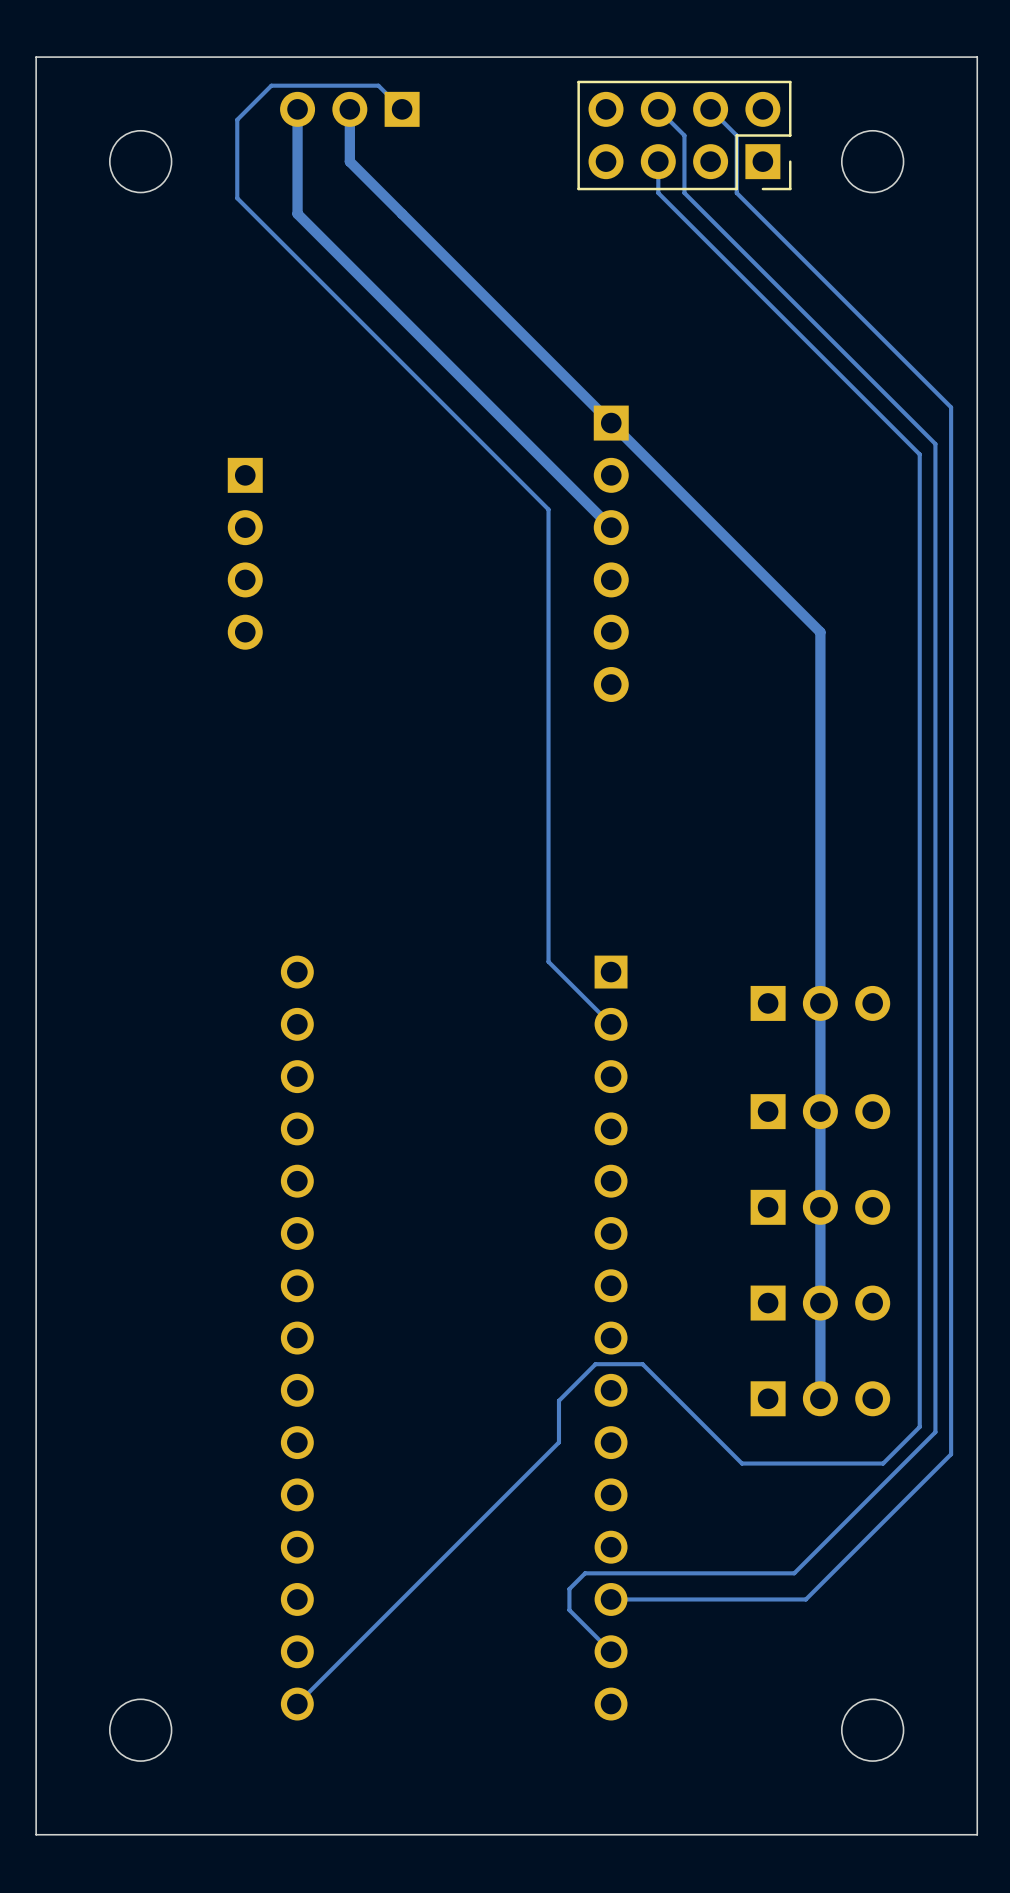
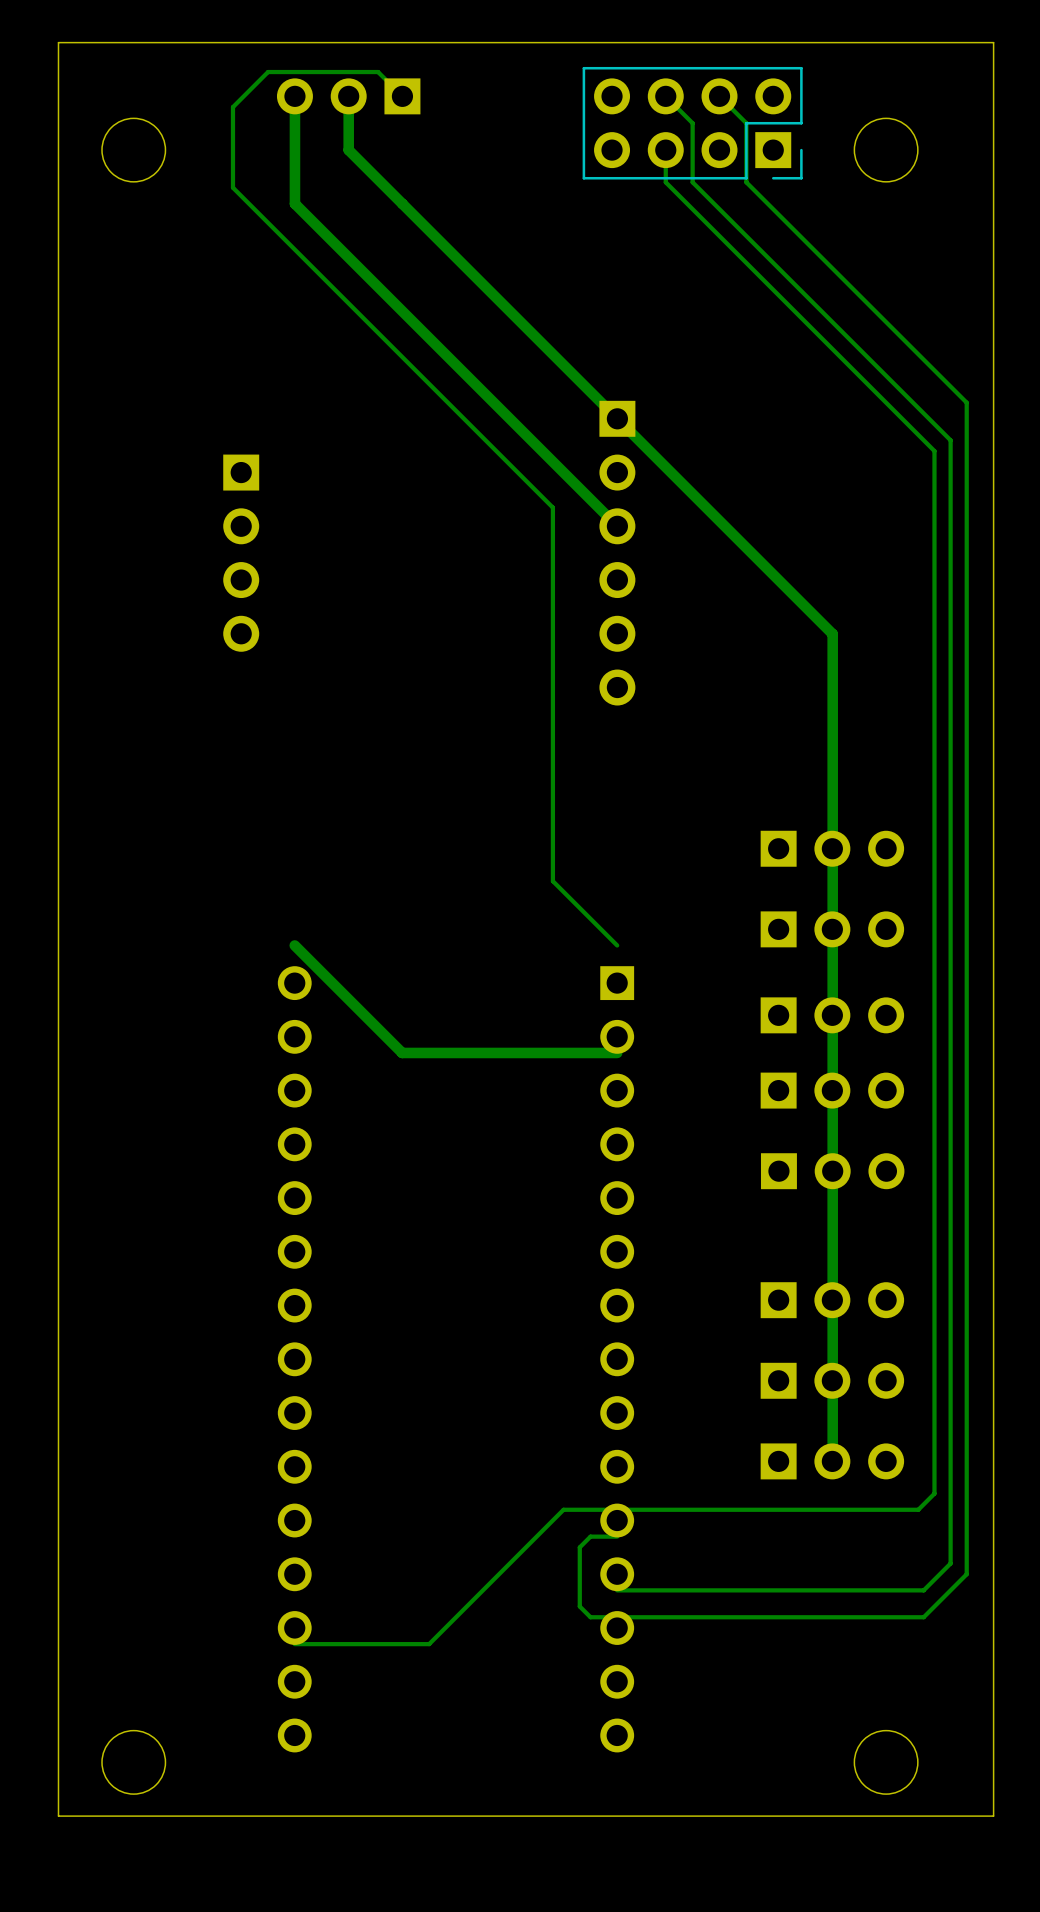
board edge: (67, 57) (36, 57) (36, 1834) (977, 1834) (977, 1782) -> (58, 42) (58, 1816) (993, 1816)
track: (820, 632) (820, 1398) -> (832, 633) (832, 1461)
part: none -> (832, 848)
track: (548, 872) (548, 961) (611, 1024) -> (552, 881) (617, 945)
part: none -> (832, 929)
track: none -> (294, 945) (402, 1052) (617, 1052)
part: none -> (832, 1090)
part: (820, 1111) -> none
part: none -> (832, 1171)
part: (820, 1207) -> none
part position: (820, 1303) -> (832, 1300)
part: none -> (832, 1380)
part: (820, 1398) -> none
track: (919, 1426) (883, 1463) (741, 1463) (642, 1364) (595, 1364) (558, 1400) (558, 1442) (297, 1704) -> (934, 1450) (934, 1493) (918, 1509) (563, 1509) (429, 1644) (294, 1644)
track: (935, 1432) (794, 1573) (585, 1573) (569, 1589) (569, 1610) (611, 1651) -> (950, 1456) (950, 1563) (923, 1590) (617, 1590)
part: none -> (832, 1461)
track: (951, 1454) (805, 1599) (611, 1599) -> (966, 1478) (966, 1574) (923, 1617) (590, 1617) (579, 1606) (579, 1547) (590, 1536) (617, 1536)

